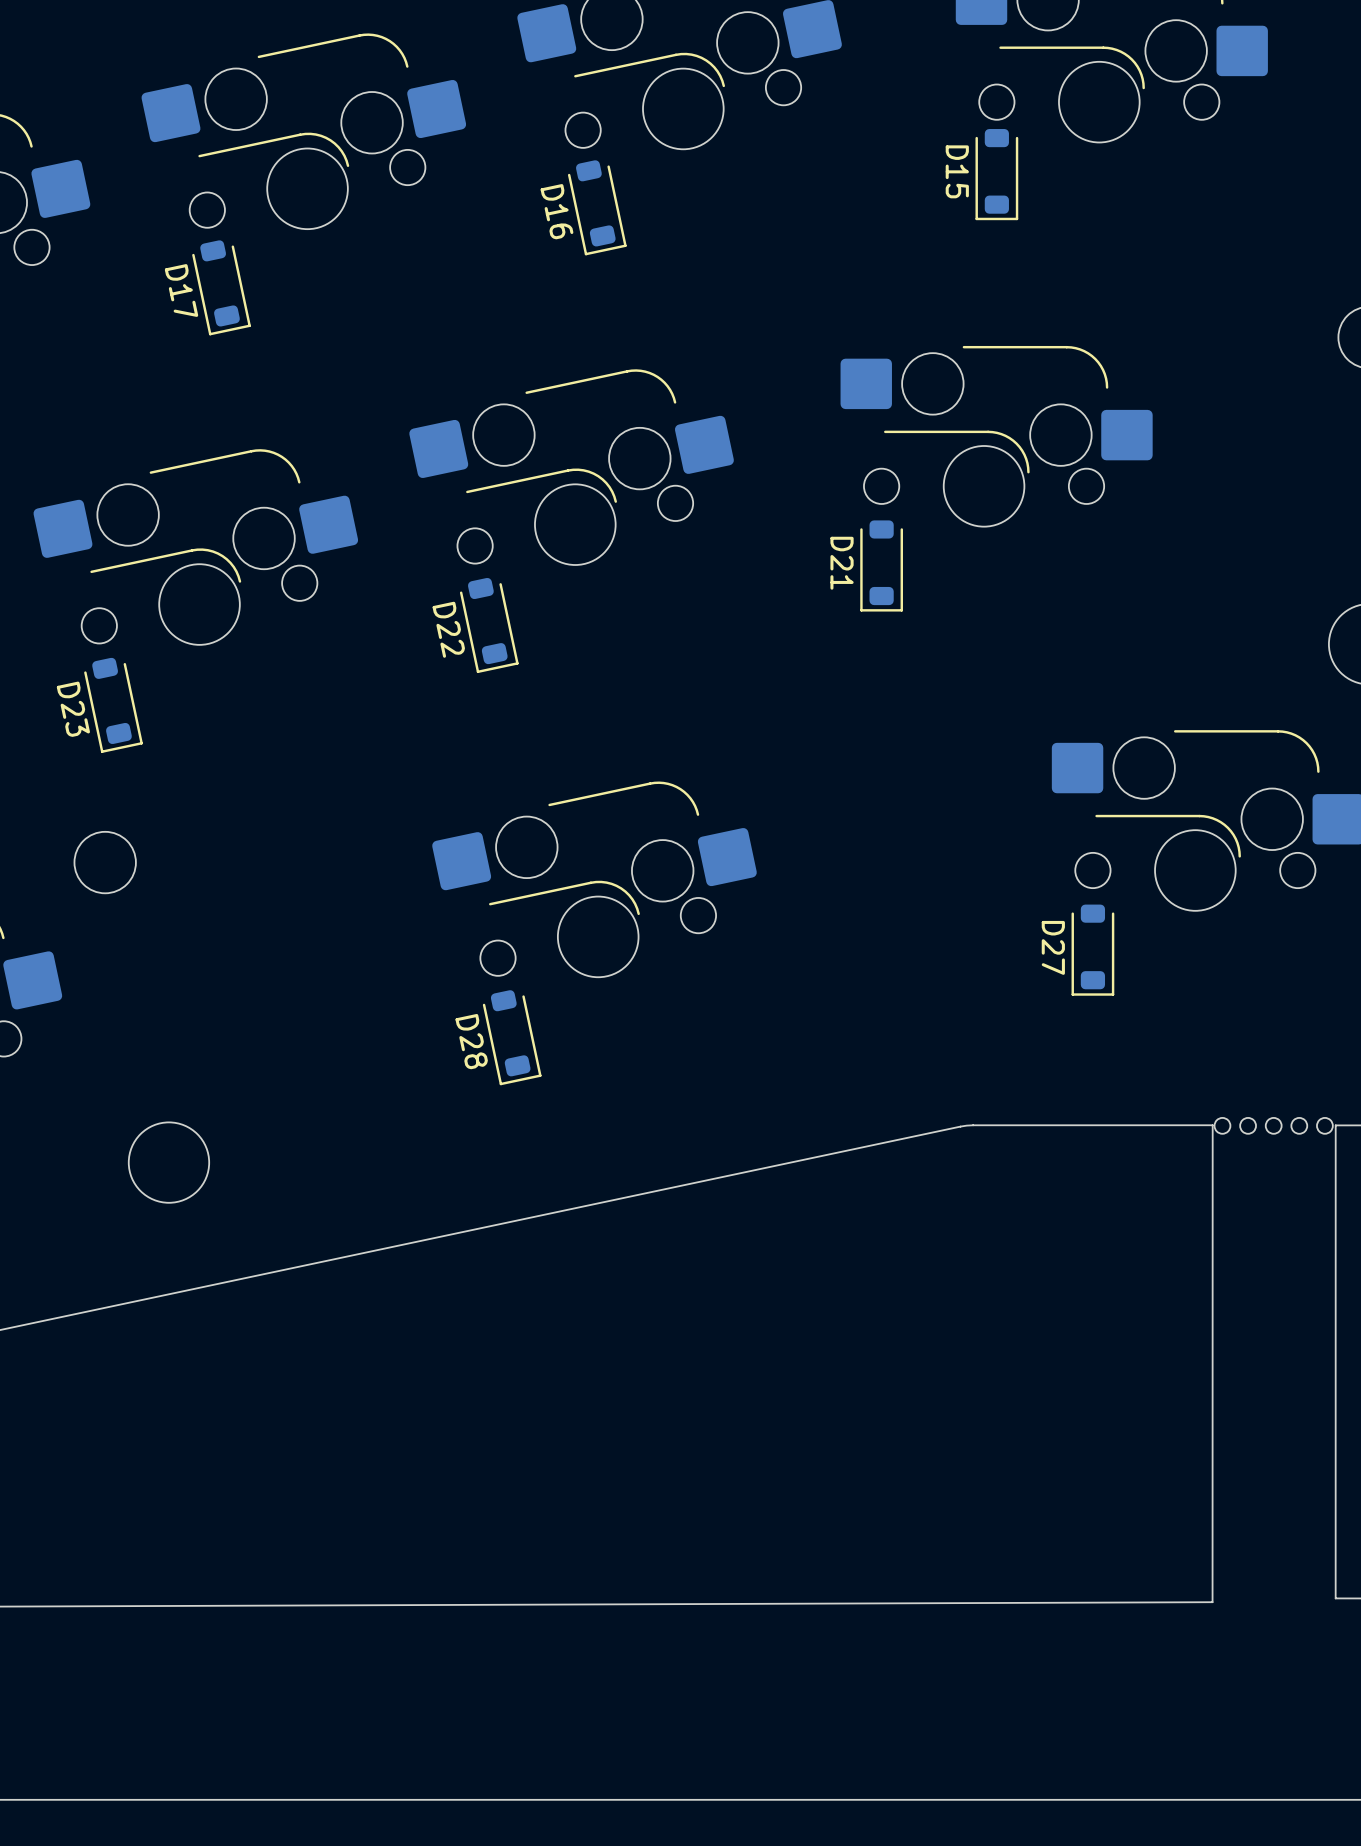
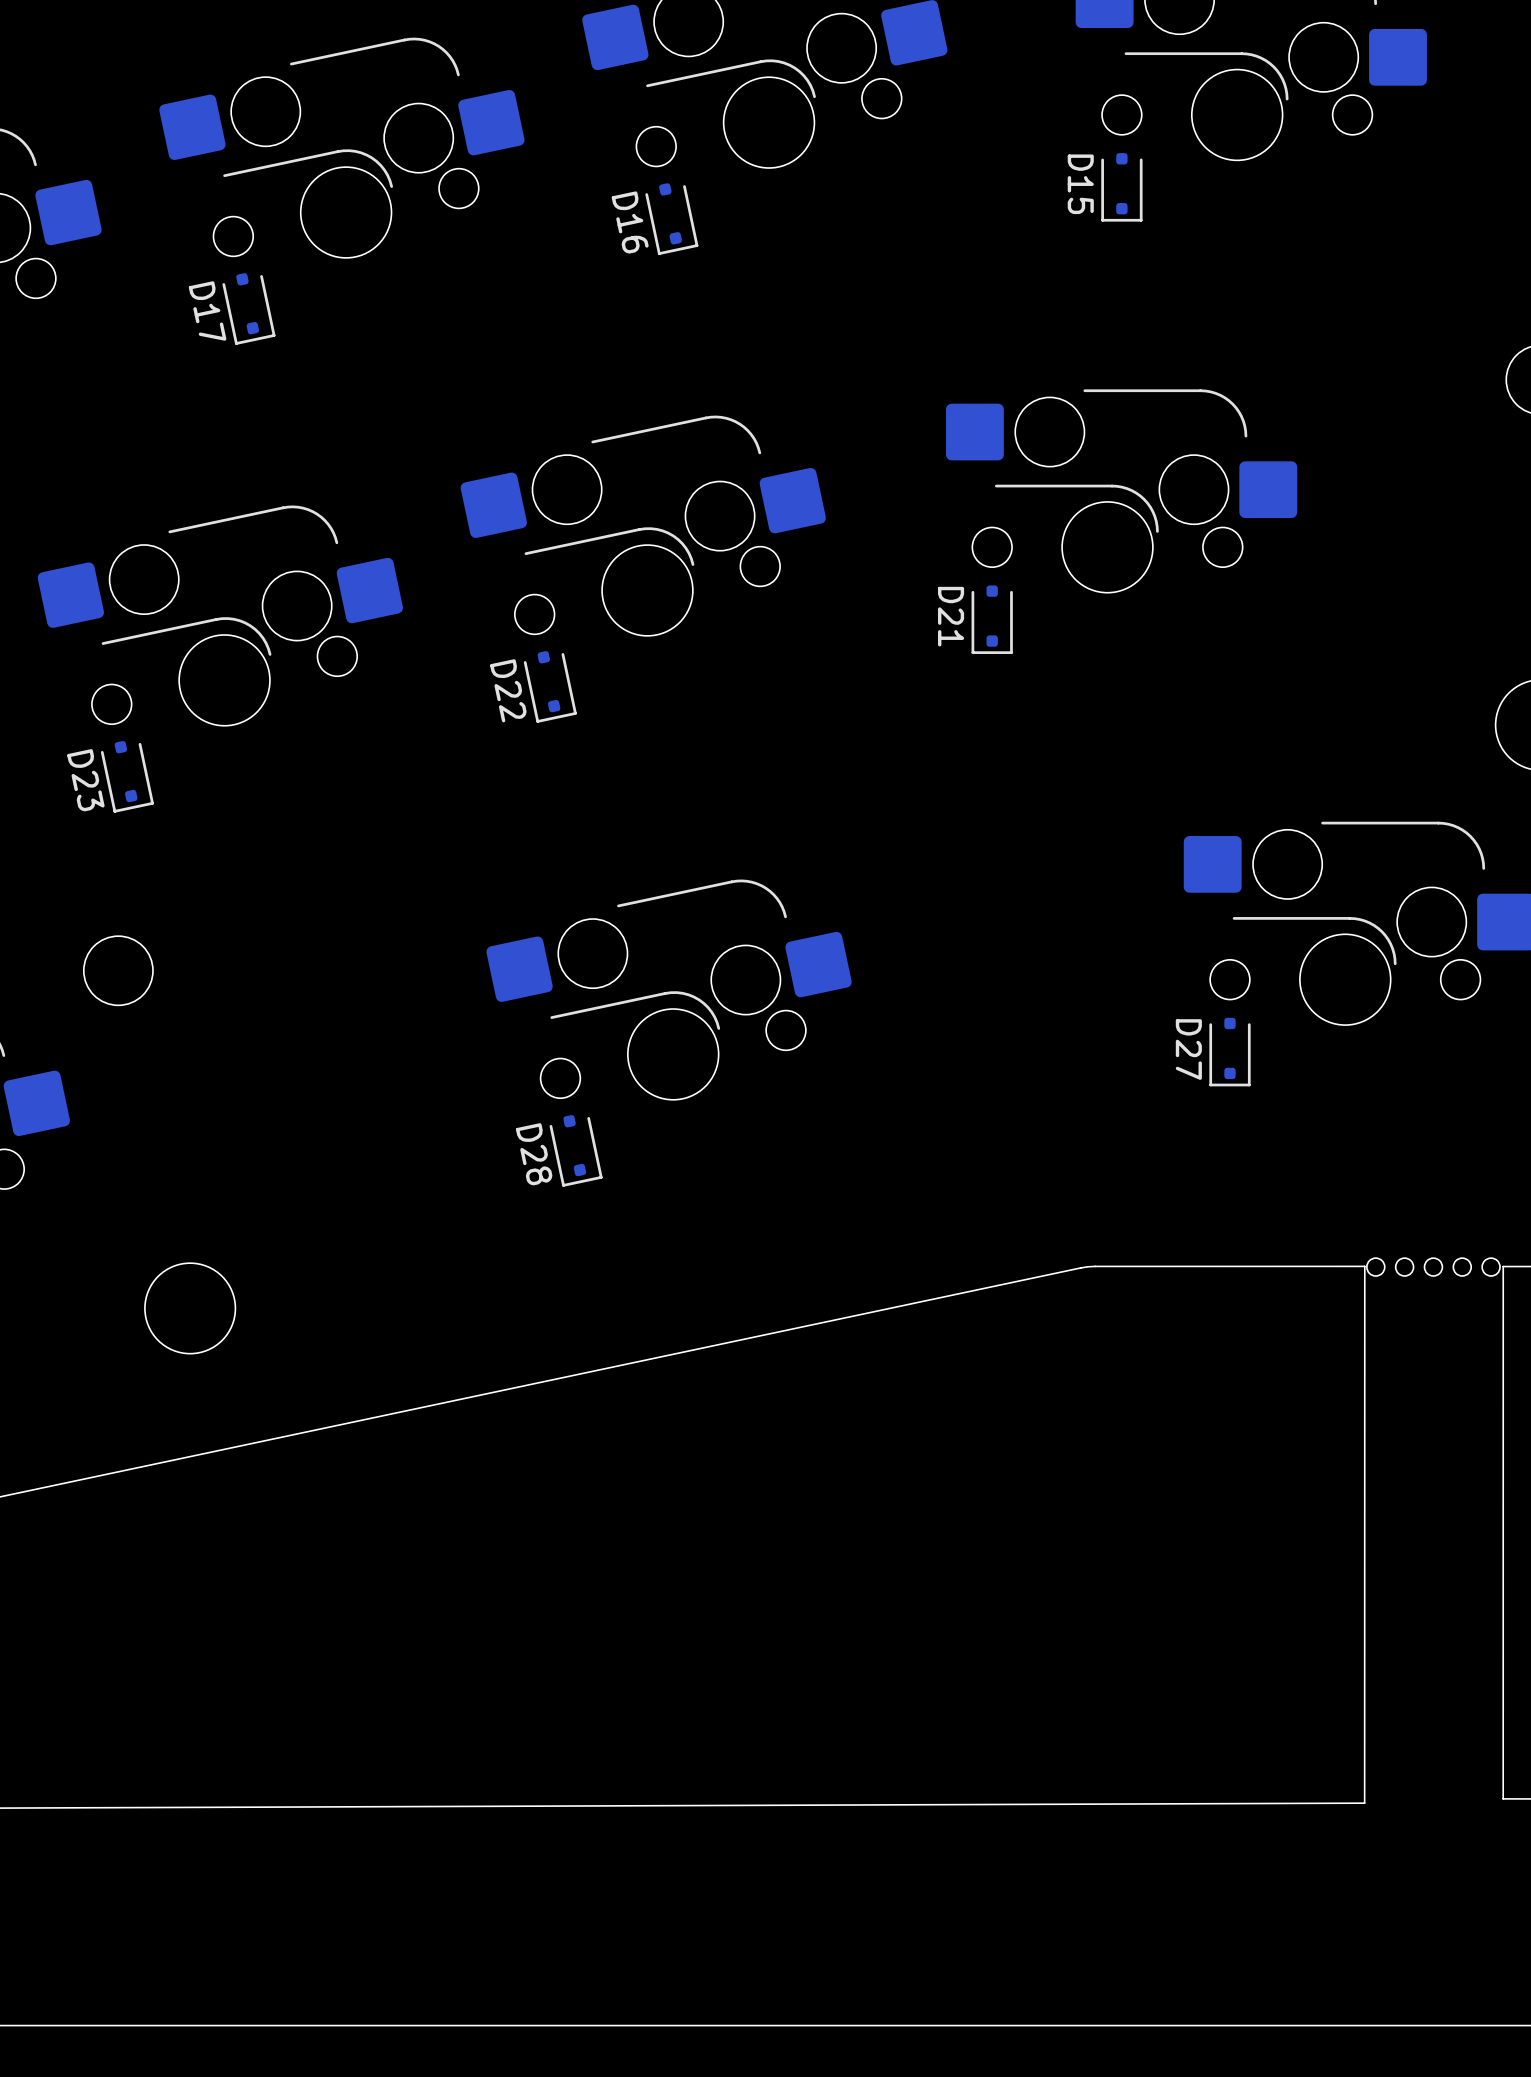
D15 footprint: [975, 129, 1019, 221] -> [1101, 153, 1143, 222]
D16 footprint: [567, 160, 627, 256] -> [645, 183, 699, 255]
D17 footprint: [192, 240, 251, 336] -> [222, 273, 276, 345]
D21 footprint: [860, 520, 903, 612] -> [971, 585, 1013, 654]
D22 footprint: [459, 577, 519, 674] -> [523, 651, 577, 723]
D23 footprint: [84, 657, 143, 753] -> [100, 740, 154, 813]
D27 footprint: [1071, 904, 1115, 996] -> [1209, 1017, 1251, 1087]
D28 footprint: [482, 990, 542, 1086] -> [549, 1115, 603, 1187]

